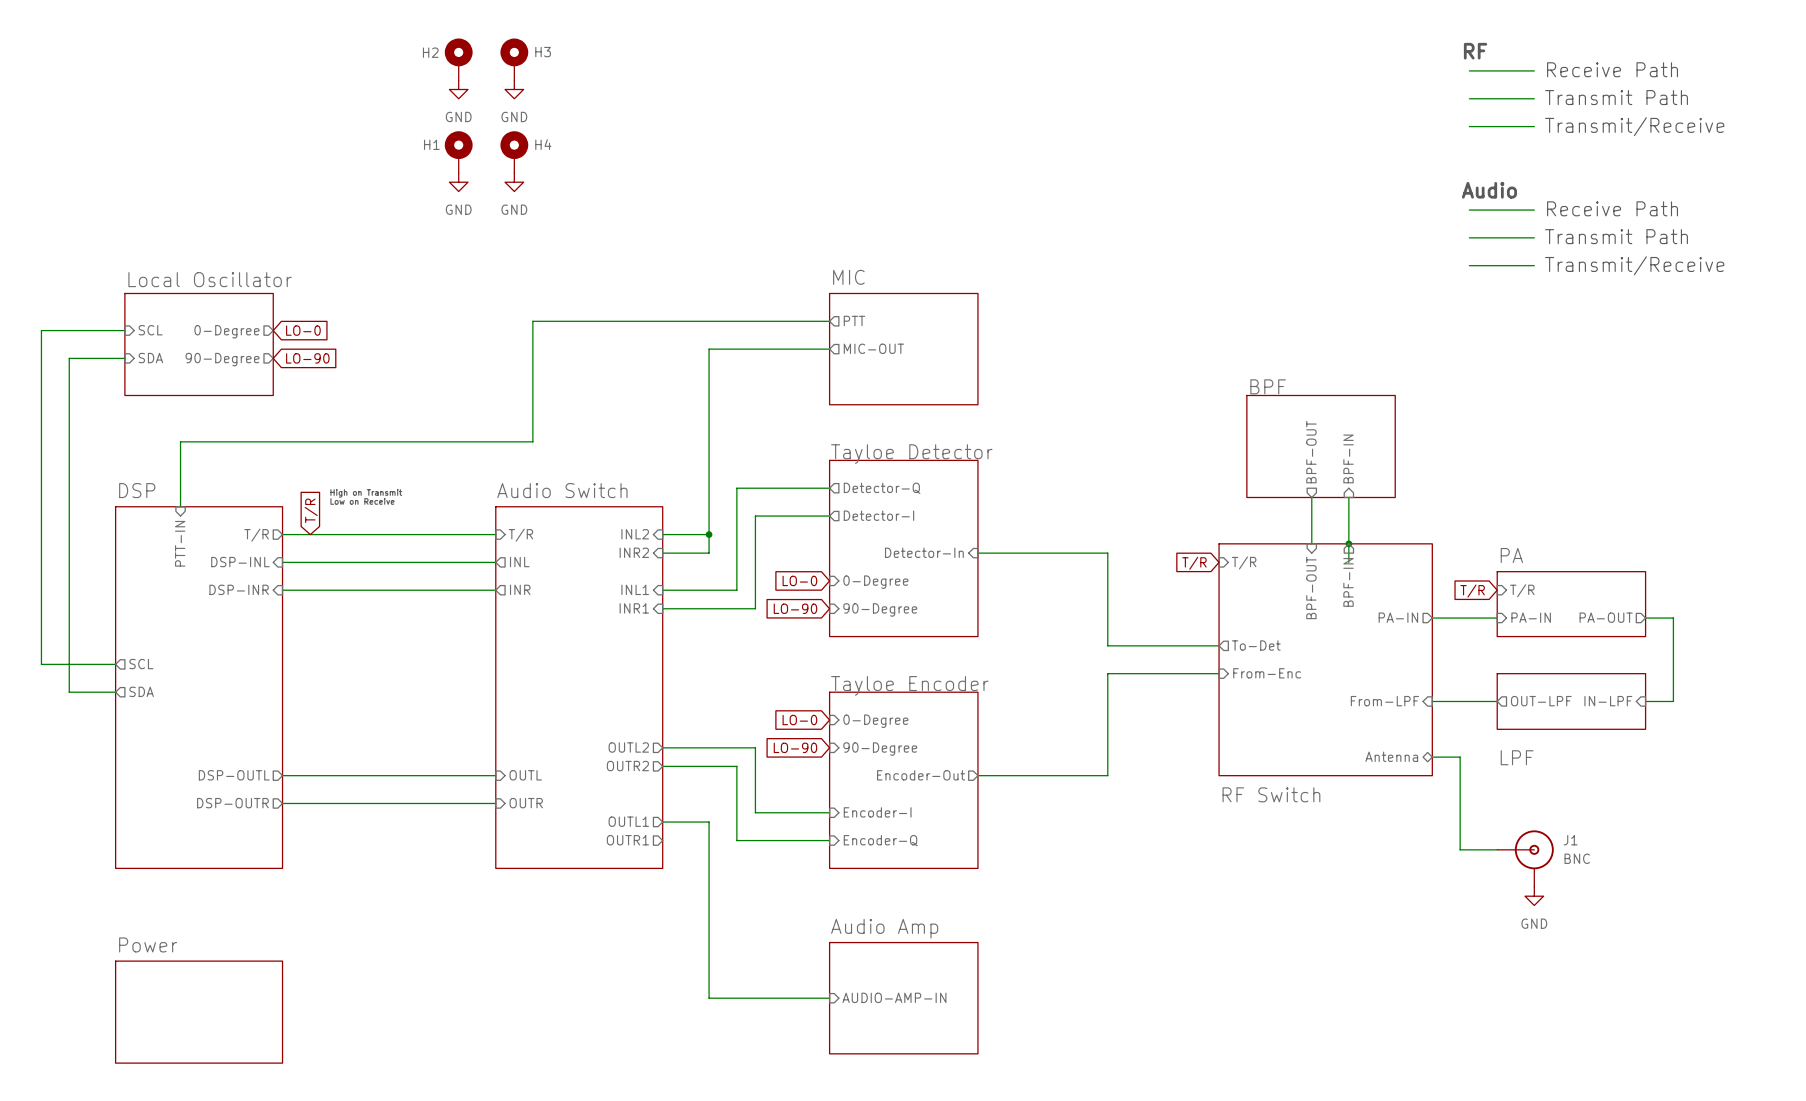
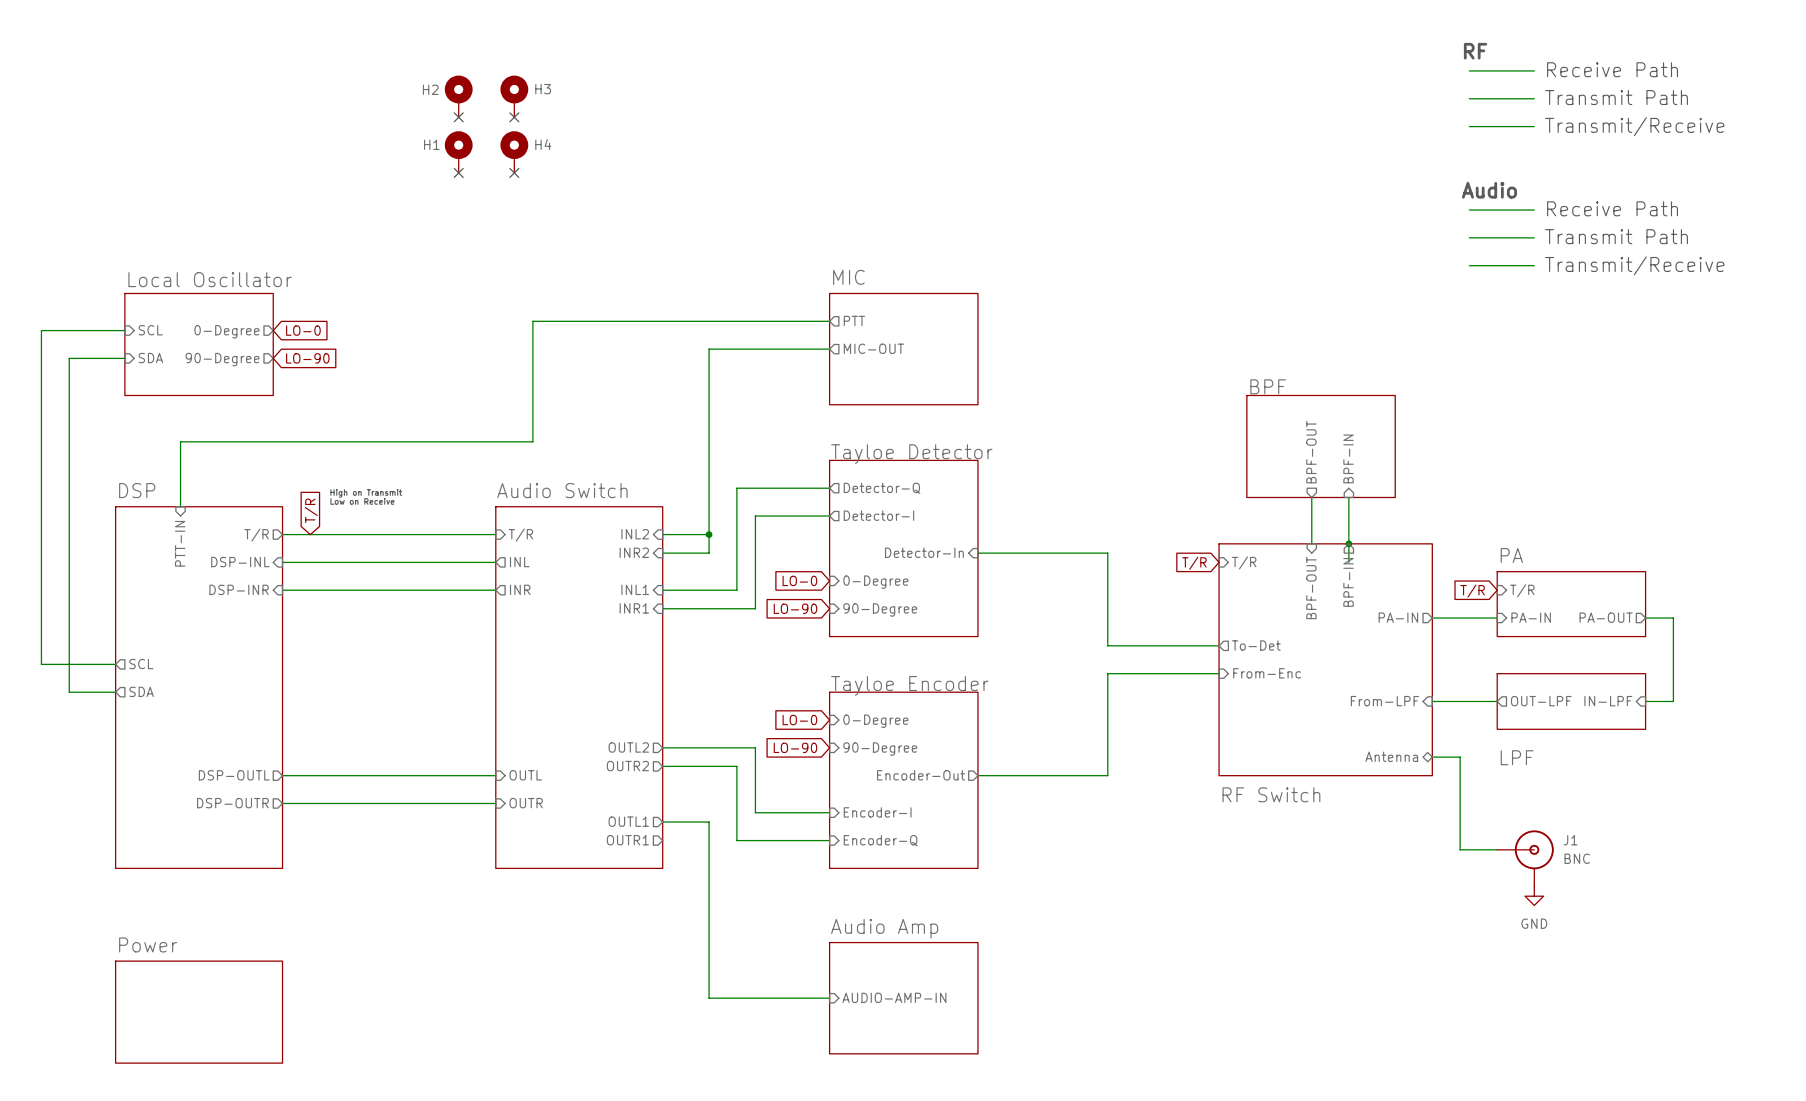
H2 position: (458, 59) -> (458, 96)
H3 position: (514, 59) -> (514, 96)
power symbol: GND (458, 89) -> none
power symbol: GND (514, 89) -> none
no-connect mark: none -> (458, 117)
no-connect mark: none -> (514, 117)
no-connect mark: none -> (458, 172)
no-connect mark: none -> (514, 172)
power symbol: GND (458, 182) -> none
power symbol: GND (514, 182) -> none

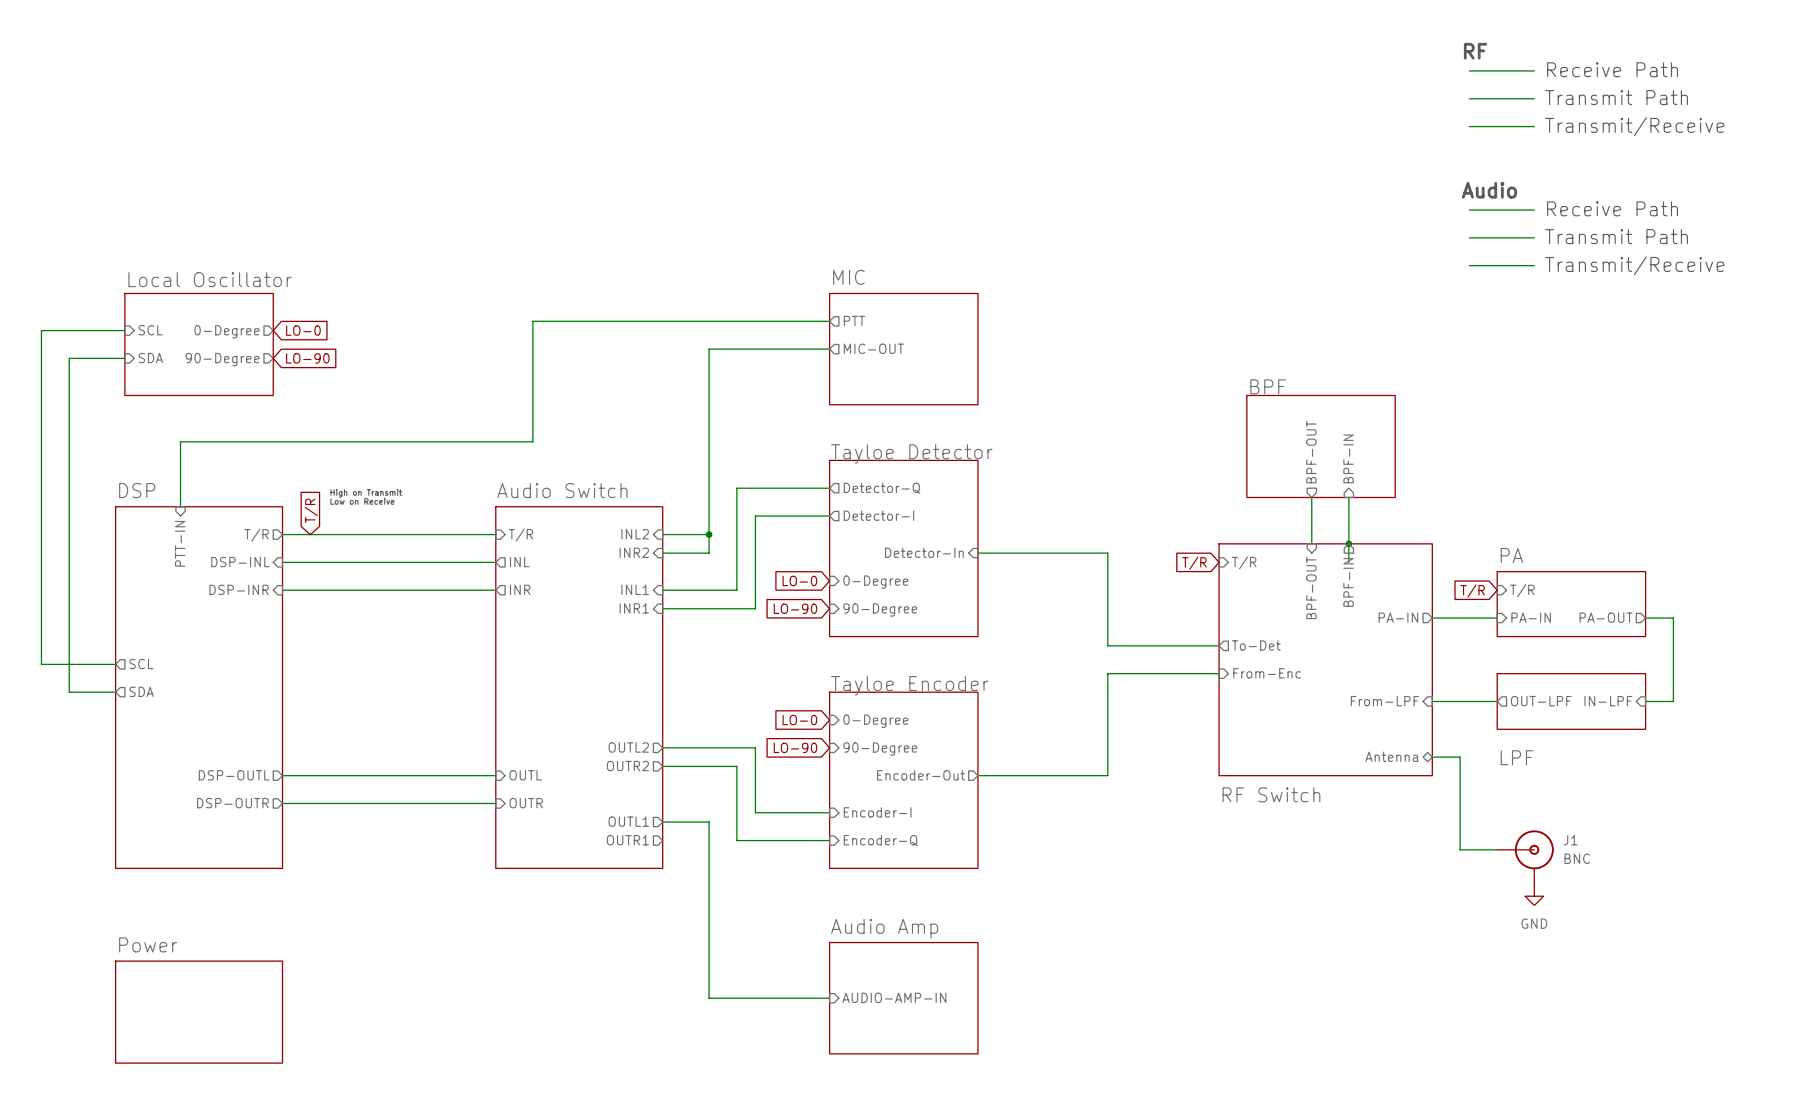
H2: (458, 96) -> none
H3: (514, 96) -> none
no-connect mark: (458, 117) -> none
no-connect mark: (514, 117) -> none
H1: (458, 152) -> none
H4: (514, 152) -> none
no-connect mark: (458, 172) -> none
no-connect mark: (514, 172) -> none

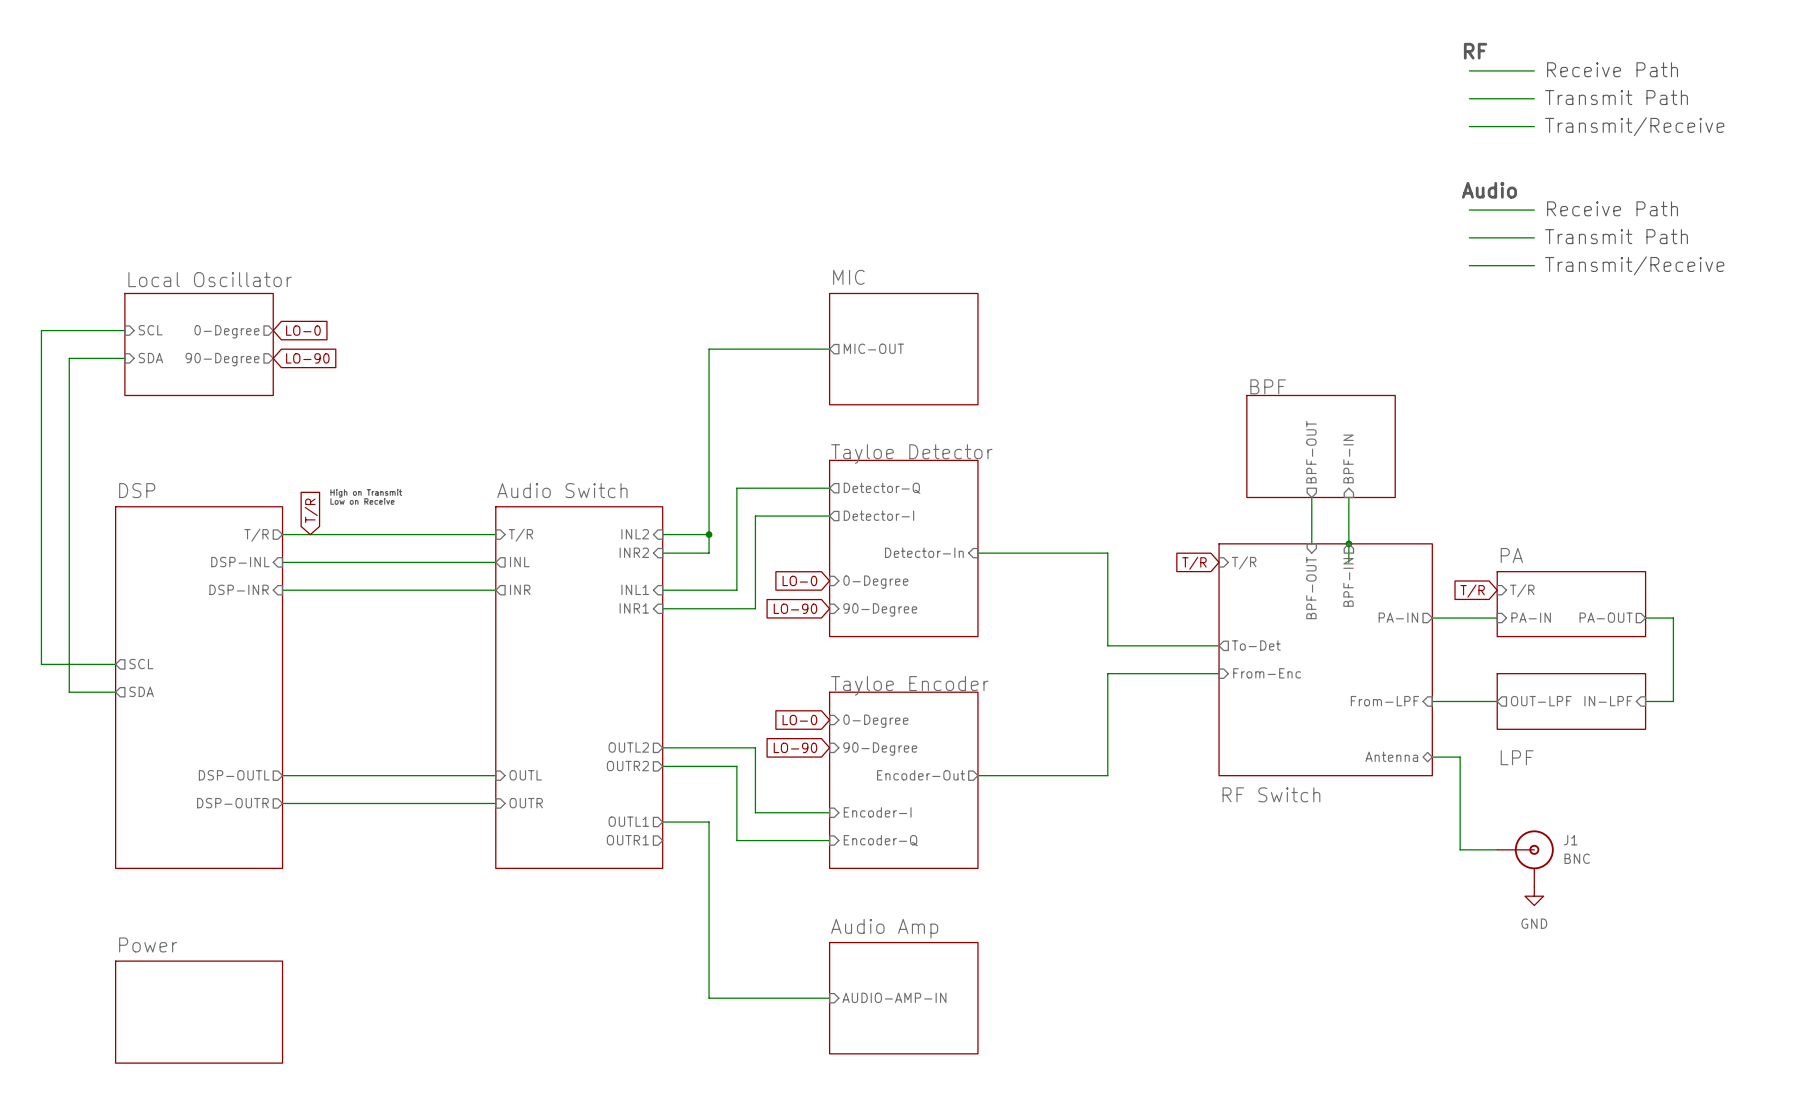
sheet pin: PTT (854, 320) -> none
wire: (829, 321) (532, 321) (532, 441) (180, 441) (180, 506) -> none
sheet pin: PTT-IN (180, 543) -> none

